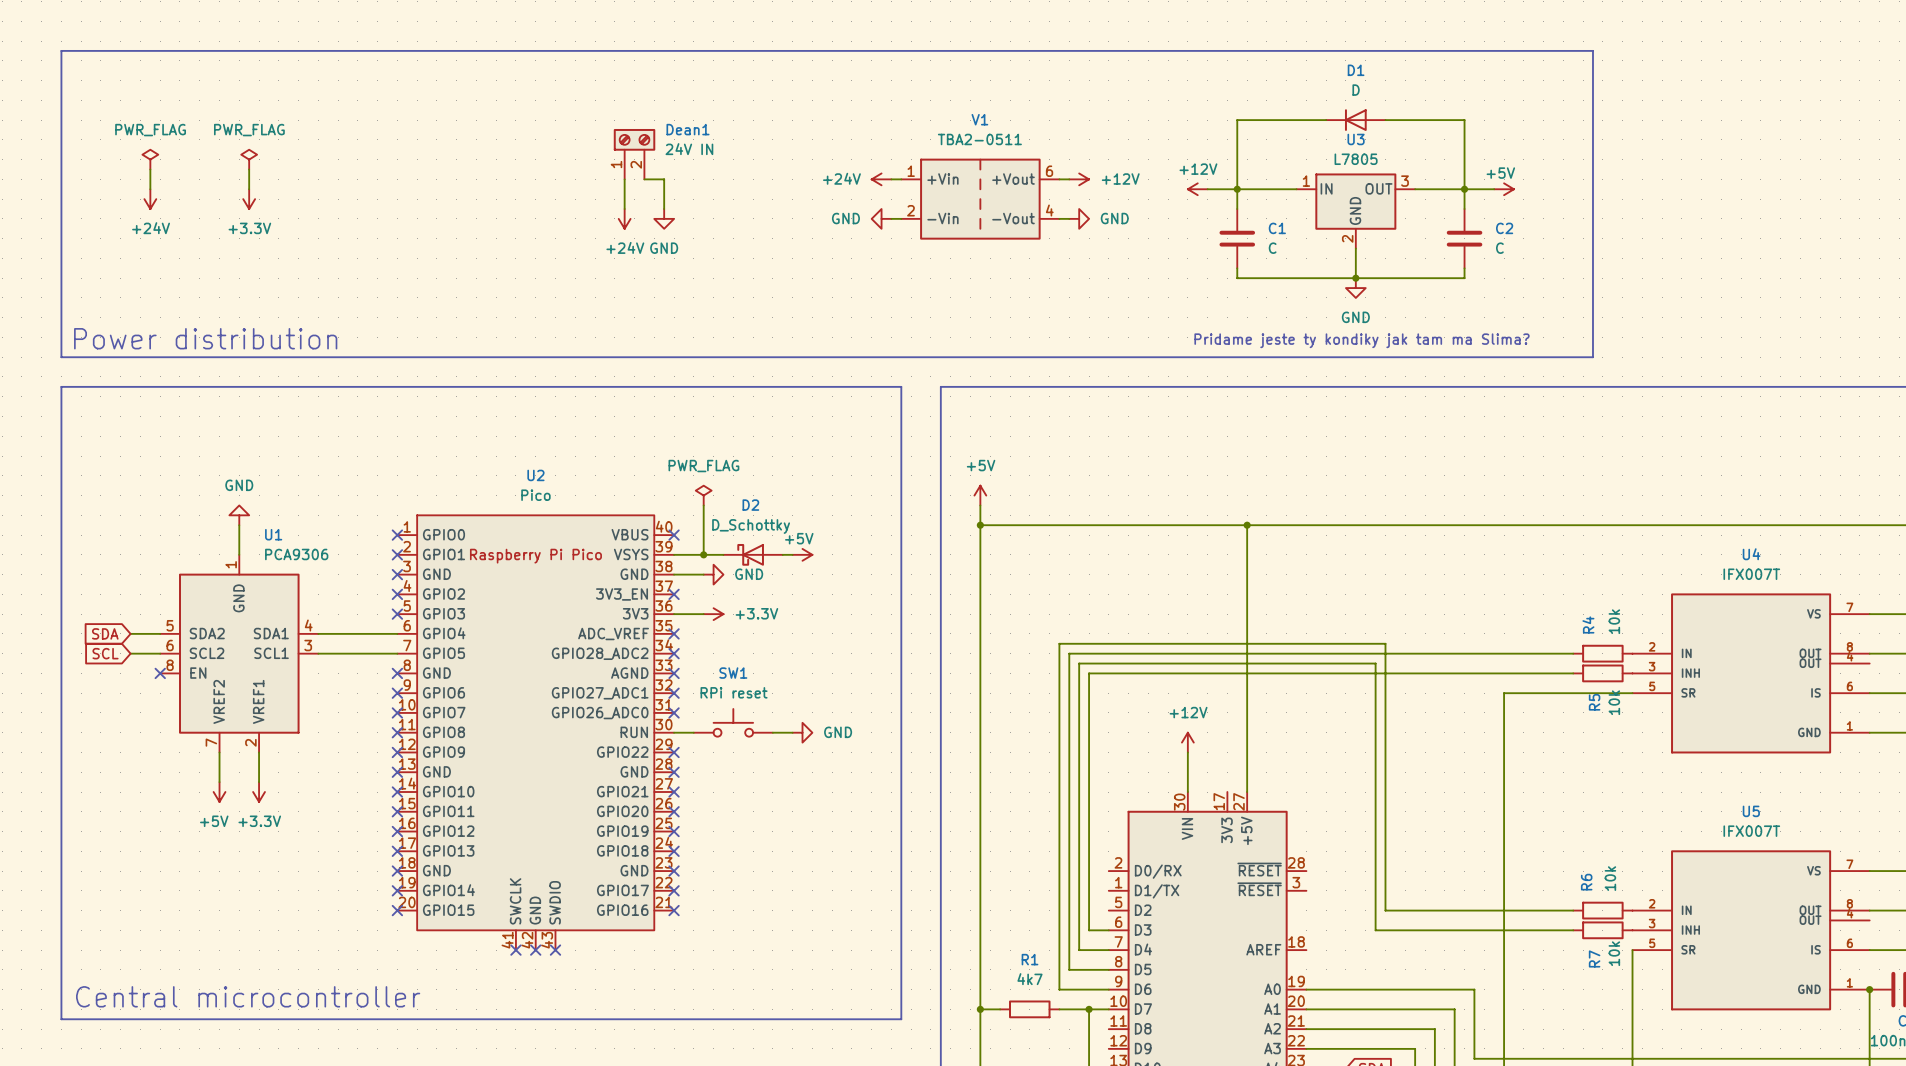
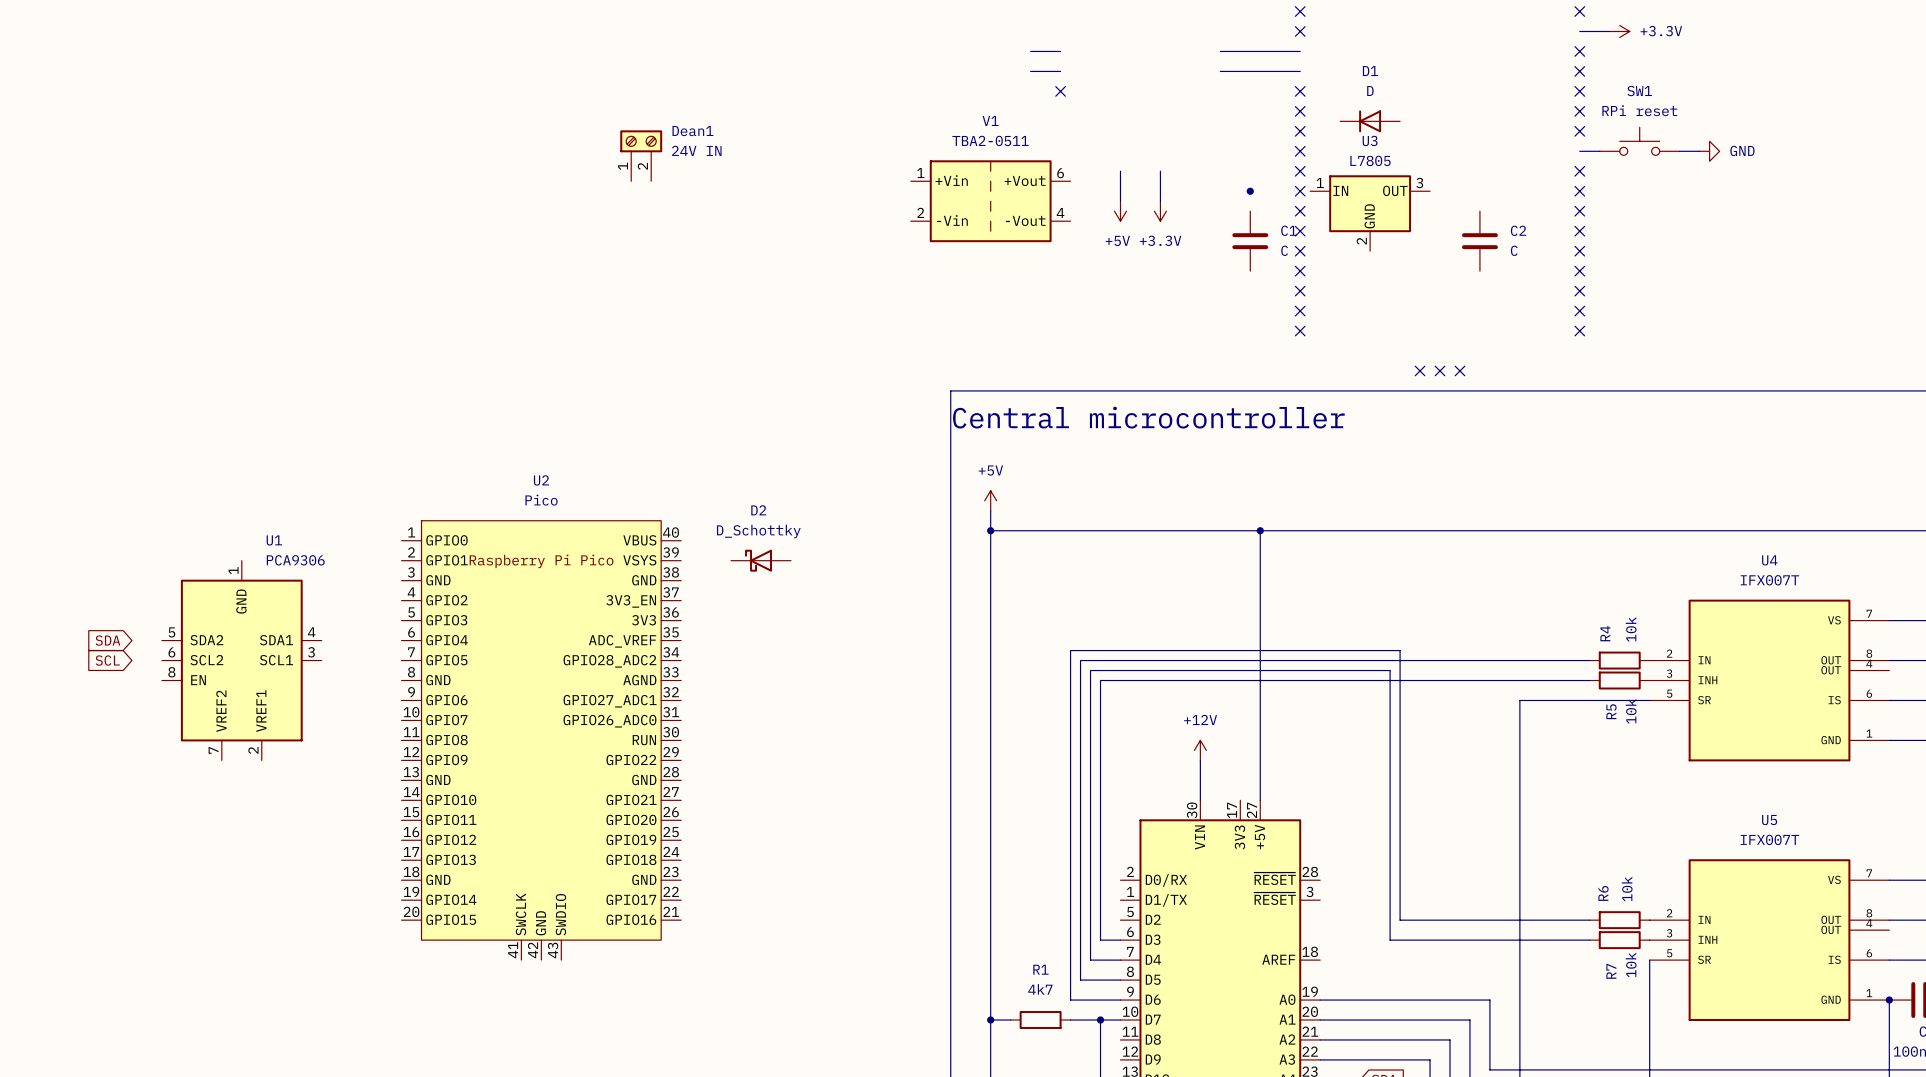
no-connect mark: none -> (1300, 11)
no-connect mark: none -> (1579, 11)
no-connect mark: none -> (1300, 31)
wire: none -> (1579, 31) (1609, 31)
power symbol: none -> +3.3V (1619, 31)
line: (61, 50) (61, 357) (1592, 357) (1592, 50) (61, 50) -> none
no-connect mark: none -> (1579, 51)
wire: none -> (1030, 71) (1060, 71)
wire: none -> (1220, 71) (1300, 71)
no-connect mark: none -> (1579, 71)
no-connect mark: none -> (1060, 91)
no-connect mark: none -> (1300, 91)
no-connect mark: none -> (1579, 91)
no-connect mark: none -> (1300, 111)
no-connect mark: none -> (1579, 111)
wire: (1326, 120) (1237, 120) (1237, 209) -> none
wire: (1385, 120) (1464, 120) (1464, 209) -> none
no-connect mark: none -> (1300, 131)
no-connect mark: none -> (1579, 131)
no-connect mark: none -> (1300, 151)
wire: none -> (1579, 151) (1599, 151)
wire: none -> (1679, 151) (1699, 151)
power symbol: none -> GND (1709, 151)
power symbol: PWR_FLAG (150, 159) -> none
power symbol: PWR_FLAG (249, 159) -> none
wire: (150, 169) (150, 189) -> none
wire: (249, 169) (249, 189) -> none
wire: none -> (1120, 171) (1120, 201)
wire: none -> (1160, 171) (1160, 201)
no-connect mark: none -> (1300, 171)
no-connect mark: none -> (1579, 171)
wire: (624, 179) (624, 209) -> none
wire: (644, 179) (664, 179) (664, 209) -> none
power symbol: +24V (881, 179) -> none
wire: (891, 179) (901, 179) -> none
wire: (1059, 179) (1069, 179) -> none
power symbol: +12V (1079, 179) -> none
power symbol: +12V (1197, 189) -> none
wire: (1207, 189) (1296, 189) -> none
no-connect mark: none -> (1300, 191)
wire: (1415, 189) (1494, 189) -> none
junction: (1464, 189) -> none
power symbol: +5V (1504, 189) -> none
no-connect mark: none -> (1579, 191)
power symbol: +24V (150, 199) -> none
power symbol: +3.3V (249, 199) -> none
power symbol: none -> +5V (1120, 211)
power symbol: none -> +3.3V (1160, 211)
no-connect mark: none -> (1300, 211)
no-connect mark: none -> (1579, 211)
power symbol: +24V (624, 218) -> none
power symbol: GND (664, 218) -> none
power symbol: GND (881, 218) -> none
wire: (891, 218) (901, 218) -> none
wire: (1059, 218) (1069, 218) -> none
power symbol: GND (1079, 218) -> none
no-connect mark: none -> (1300, 231)
no-connect mark: none -> (1579, 231)
no-connect mark: none -> (1300, 251)
wire: (1355, 248) (1355, 278) -> none
no-connect mark: none -> (1579, 251)
wire: (1237, 268) (1237, 278) (1464, 278) (1464, 268) -> none
no-connect mark: none -> (1300, 271)
no-connect mark: none -> (1579, 271)
junction: (1355, 278) -> none
no-connect mark: none -> (1300, 291)
power symbol: GND (1355, 288) -> none
no-connect mark: none -> (1579, 291)
no-connect mark: none -> (1300, 311)
no-connect mark: none -> (1579, 311)
no-connect mark: none -> (1300, 331)
no-connect mark: none -> (1579, 331)
text: Power distribution (205, 338) -> none
text: Pridame jeste ty kondiky jak tam ma Slima? (1362, 340) -> none
no-connect mark: none -> (1420, 370)
no-connect mark: none -> (1440, 370)
no-connect mark: none -> (1459, 370)
line: (61, 386) (901, 386) (901, 1019) (61, 1019) (61, 386) -> none
text: none -> Central microcontroller (1148, 417)
power symbol: PWR_FLAG (703, 495) -> none
wire: (703, 505) (703, 554) -> none
power symbol: GND (239, 515) -> none
wire: (239, 525) (239, 554) -> none
no-connect mark: (397, 535) -> none
no-connect mark: (674, 535) -> none
no-connect mark: (397, 554) -> none
wire: (674, 554) (723, 554) -> none
junction: (703, 554) -> none
wire: (782, 554) (792, 554) -> none
power symbol: +5V (802, 554) -> none
no-connect mark: (397, 574) -> none
wire: (674, 574) (703, 574) -> none
power symbol: GND (713, 574) -> none
no-connect mark: (397, 594) -> none
no-connect mark: (674, 594) -> none
no-connect mark: (397, 614) -> none
wire: (674, 614) (703, 614) -> none
power symbol: +3.3V (713, 614) -> none
wire: (130, 633) (160, 633) -> none
wire: (318, 633) (397, 633) -> none
no-connect mark: (674, 633) -> none
wire: (130, 653) (160, 653) -> none
wire: (318, 653) (397, 653) -> none
no-connect mark: (674, 653) -> none
no-connect mark: (160, 673) -> none
no-connect mark: (397, 673) -> none
no-connect mark: (674, 673) -> none
no-connect mark: (397, 693) -> none
no-connect mark: (674, 693) -> none
no-connect mark: (397, 712) -> none
no-connect mark: (674, 712) -> none
SW1 position: (733, 722) -> (1639, 141)
no-connect mark: (397, 732) -> none
wire: (674, 732) (693, 732) -> none
wire: (772, 732) (792, 732) -> none
power symbol: GND (802, 732) -> none
wire: (219, 752) (219, 782) -> none
wire: (259, 752) (259, 782) -> none
no-connect mark: (397, 752) -> none
no-connect mark: (674, 752) -> none
no-connect mark: (397, 772) -> none
no-connect mark: (674, 772) -> none
power symbol: +5V (219, 792) -> none
power symbol: +3.3V (259, 792) -> none
no-connect mark: (397, 792) -> none
no-connect mark: (674, 792) -> none
no-connect mark: (397, 811) -> none
no-connect mark: (674, 811) -> none
no-connect mark: (397, 831) -> none
no-connect mark: (674, 831) -> none
no-connect mark: (397, 851) -> none
no-connect mark: (674, 851) -> none
no-connect mark: (397, 871) -> none
no-connect mark: (674, 871) -> none
no-connect mark: (397, 890) -> none
no-connect mark: (674, 890) -> none
no-connect mark: (397, 910) -> none
no-connect mark: (674, 910) -> none
no-connect mark: (515, 950) -> none
no-connect mark: (535, 950) -> none
no-connect mark: (555, 950) -> none
text: Central microcontroller (248, 996) -> none

